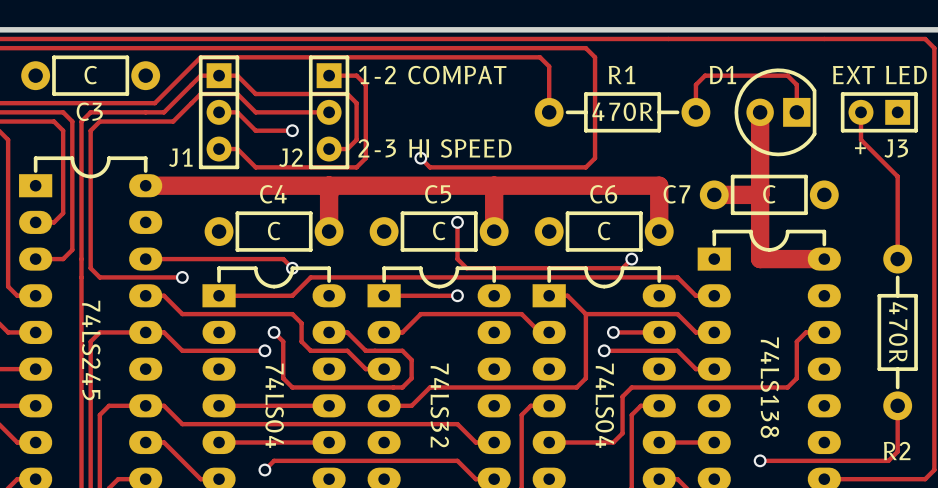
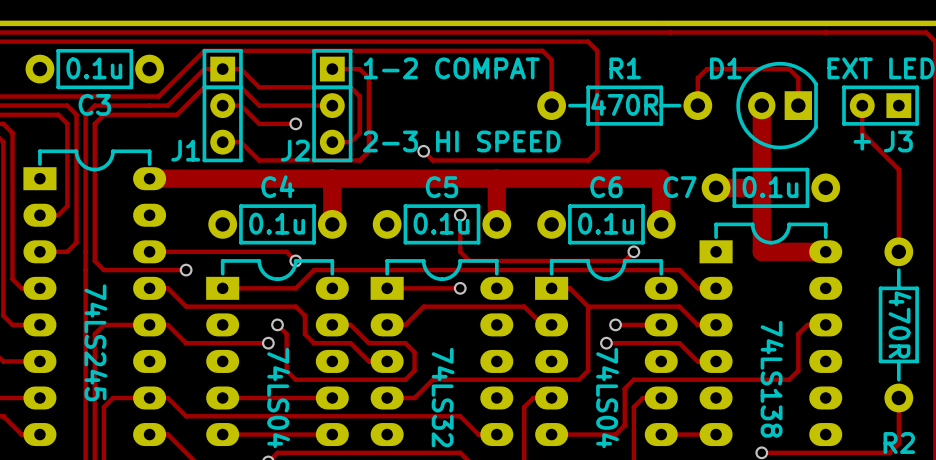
C3 value: C (90, 75) -> 0.1u (94, 68)
C7 value: C (769, 194) -> 0.1u (770, 187)
C4 value: C (274, 231) -> 0.1u (277, 223)
C5 value: C (439, 231) -> 0.1u (441, 223)
C6 value: C (604, 231) -> 0.1u (606, 223)

